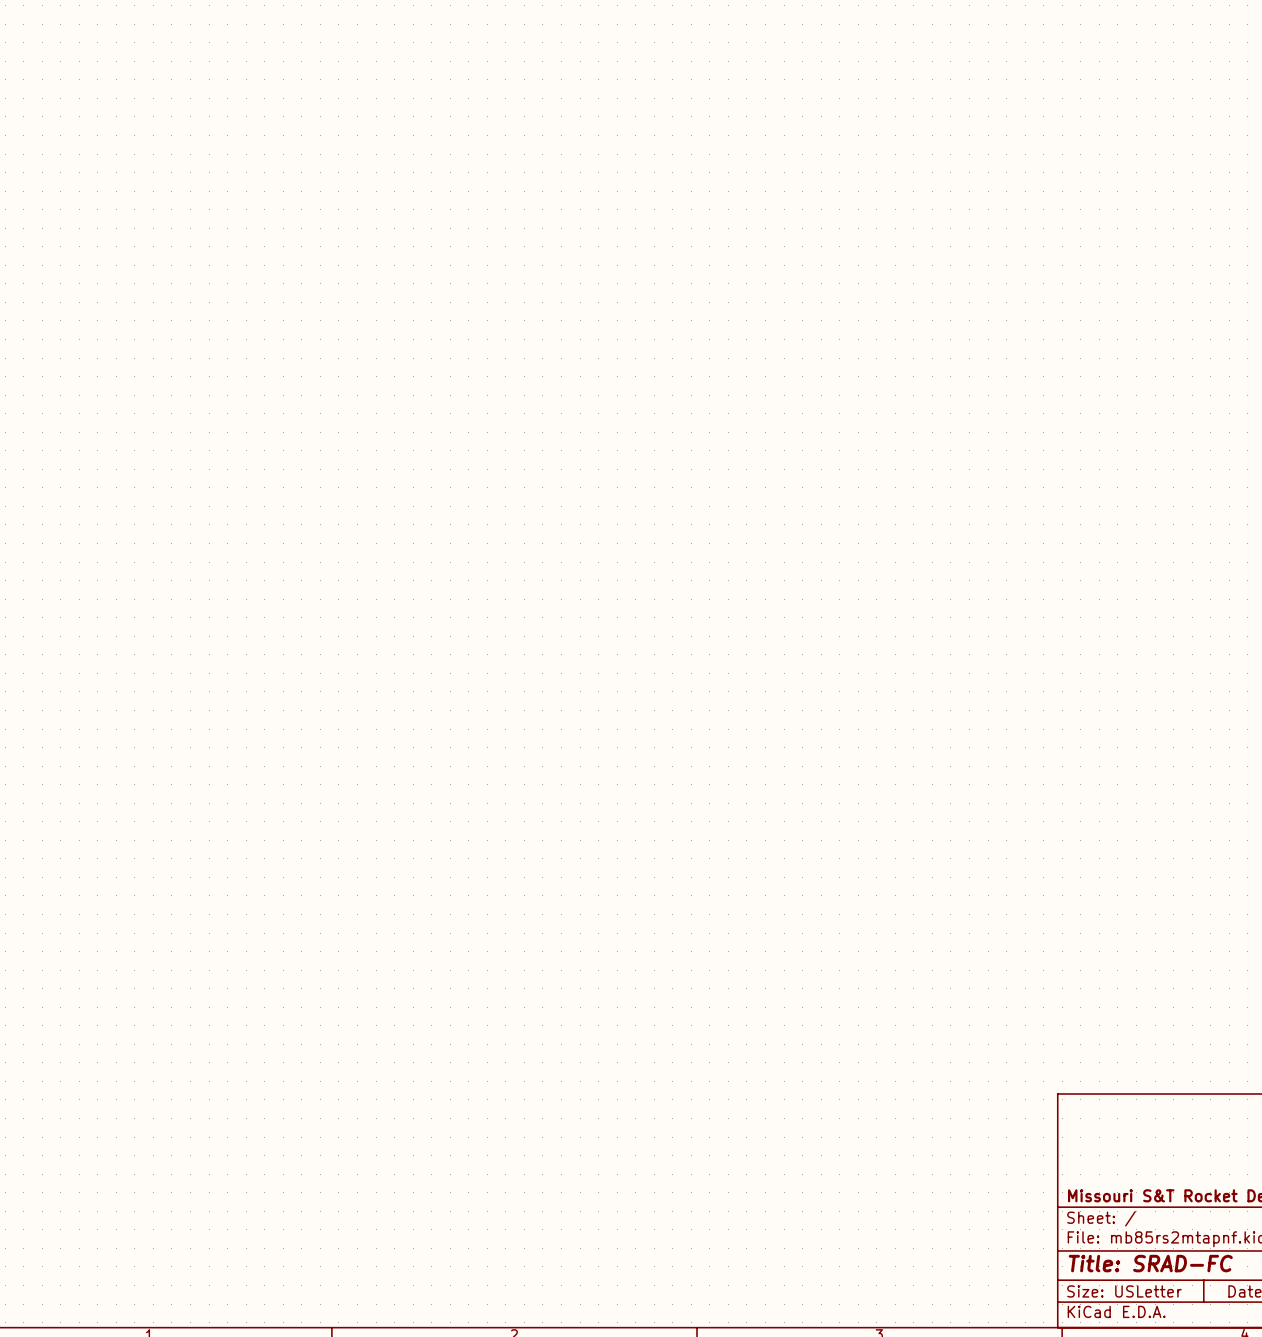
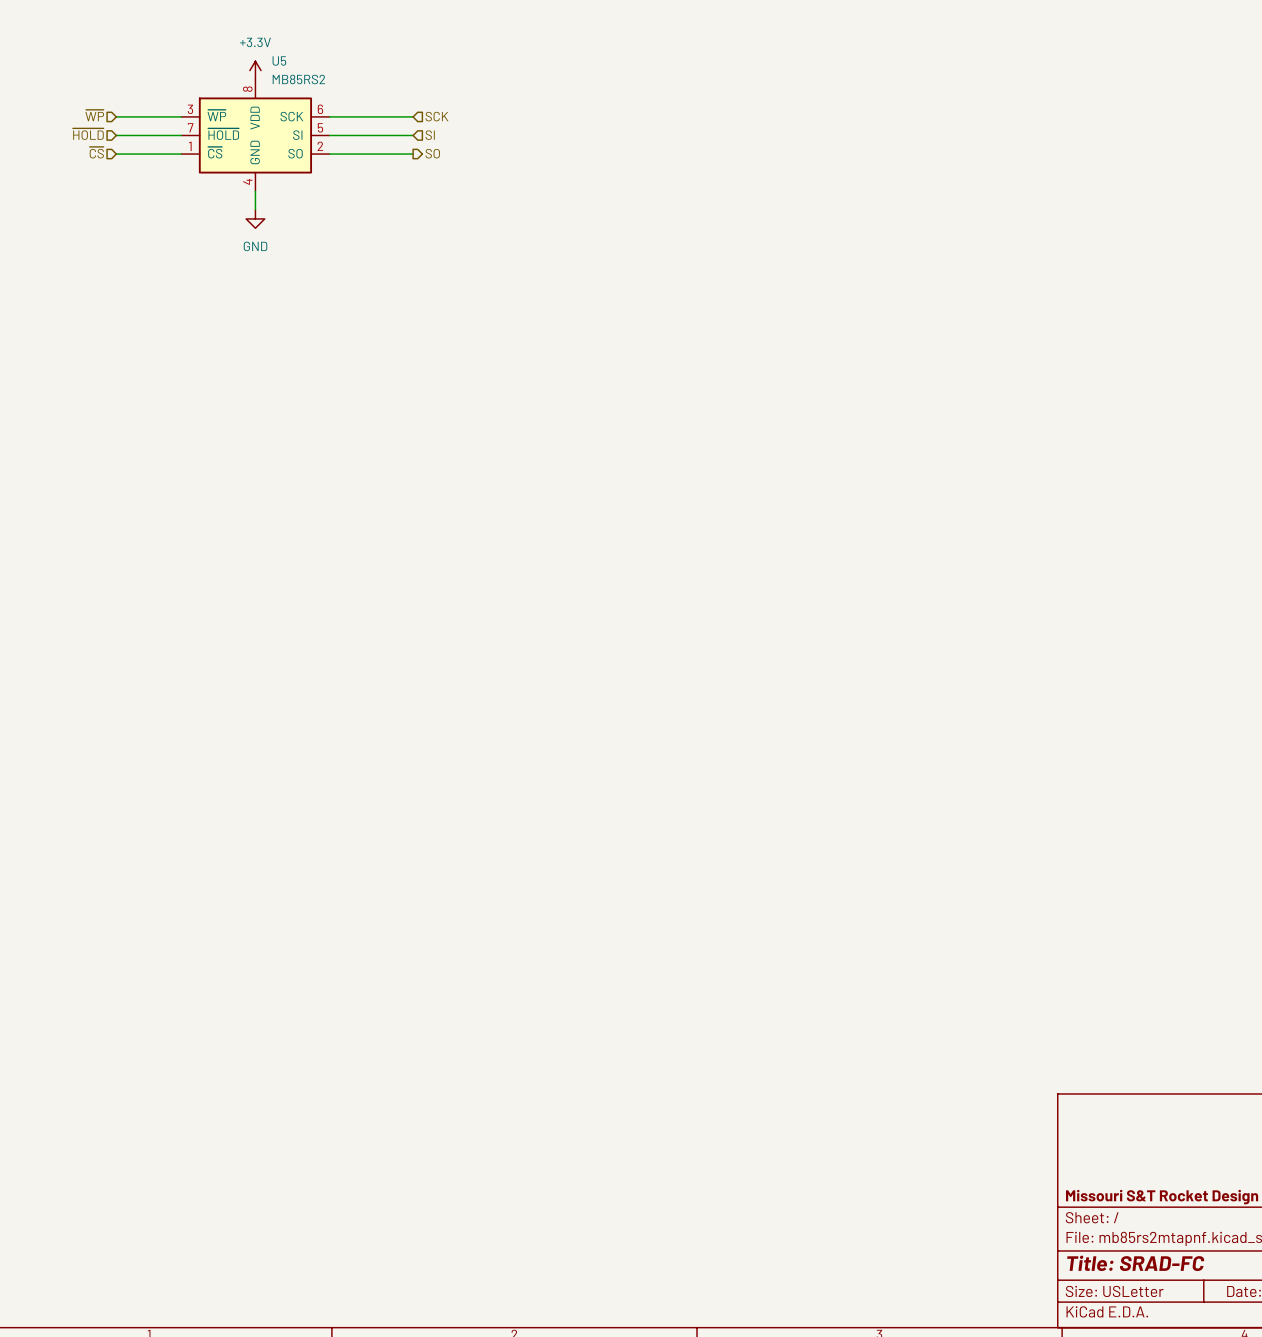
power symbol: none -> +3.3V (255, 70)
hierarchical label: none -> ~{WP} (94, 115)
wire: none -> (116, 116) (181, 116)
wire: none -> (329, 116) (413, 116)
hierarchical label: none -> SCK (436, 116)
hierarchical label: none -> ~{HOLD} (88, 134)
wire: none -> (116, 135) (181, 135)
U5: none -> MB85RS2 (255, 135)
wire: none -> (329, 135) (413, 135)
hierarchical label: none -> SI (430, 135)
hierarchical label: none -> ~{CS} (96, 152)
hierarchical label: none -> SO (432, 153)
wire: none -> (116, 154) (181, 154)
wire: none -> (329, 154) (413, 154)
wire: none -> (255, 191) (255, 209)
power symbol: none -> GND (255, 218)

